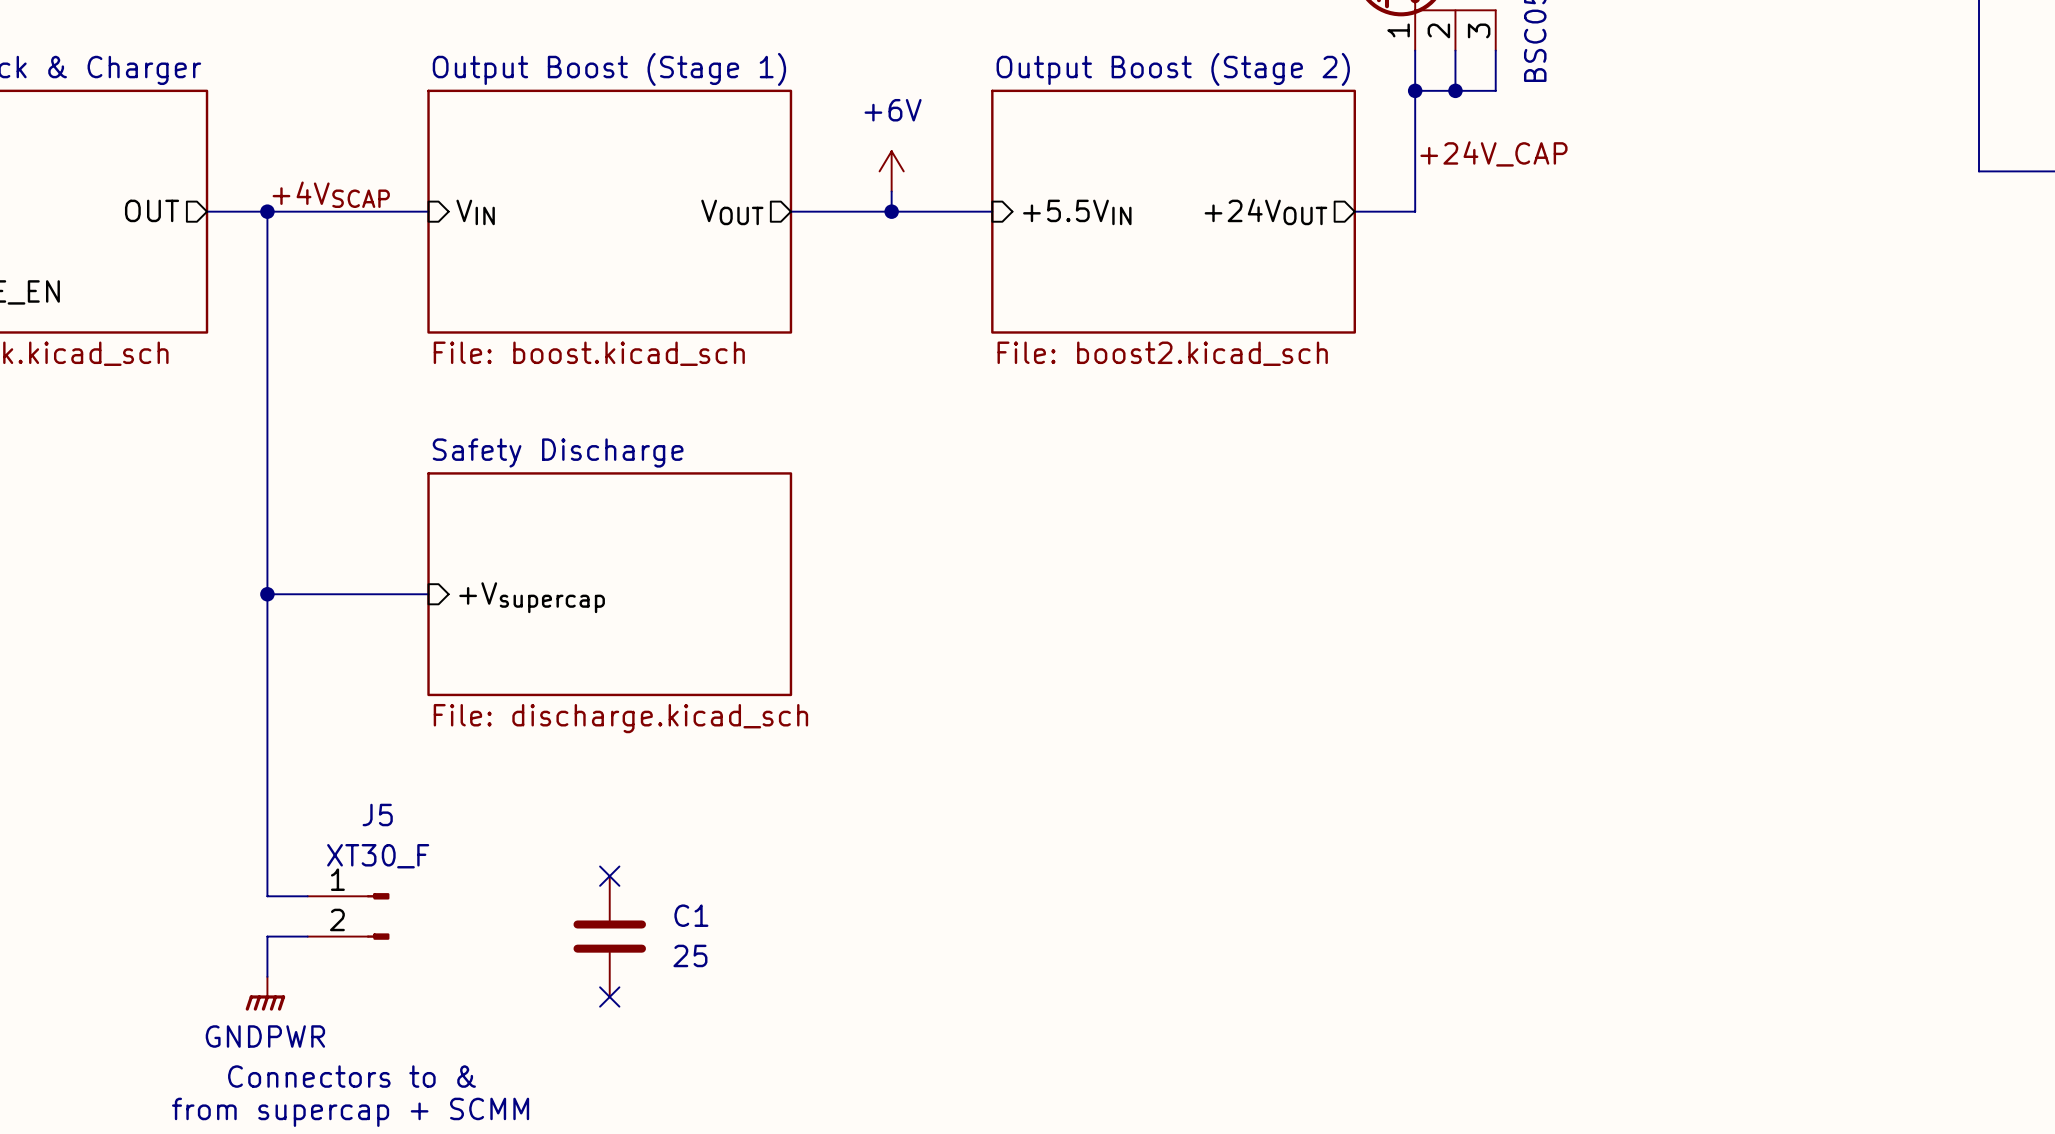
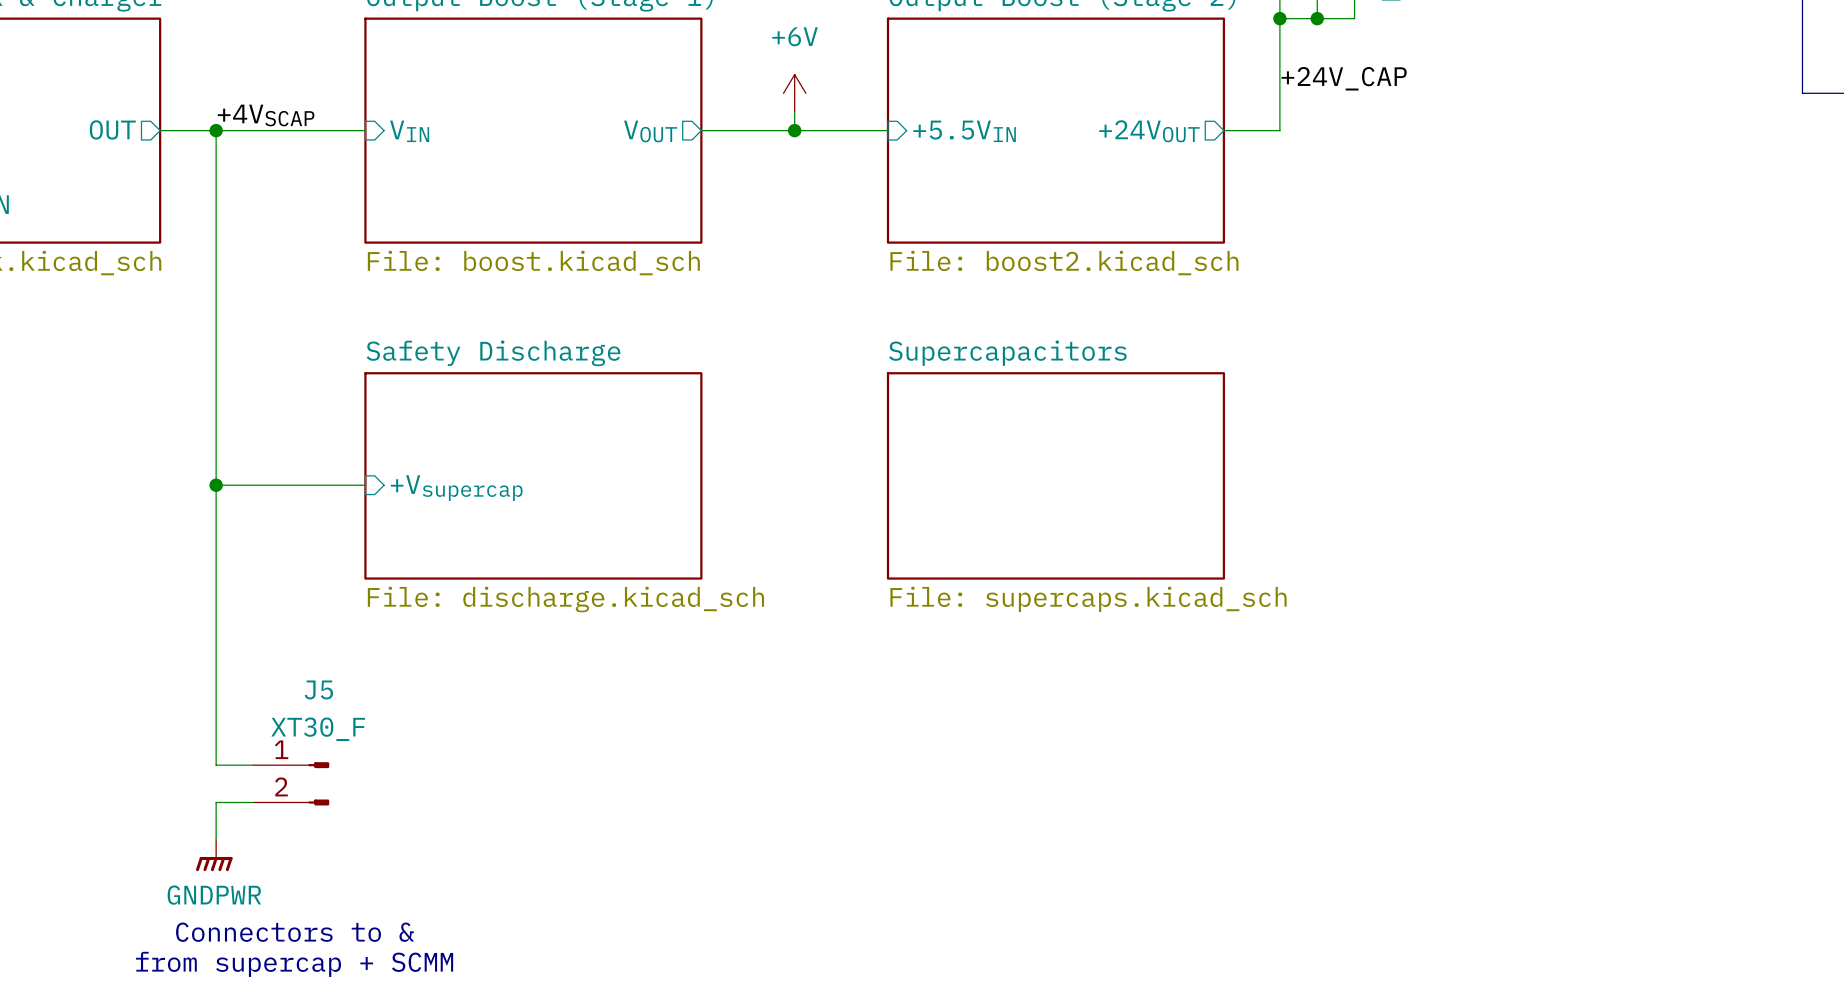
sheet Supercapacitors: none -> File: supercaps.kicad_sch (1055, 475)
no-connect mark: (609, 876) -> none
C1: 25 (609, 936) -> none
no-connect mark: (609, 996) -> none

